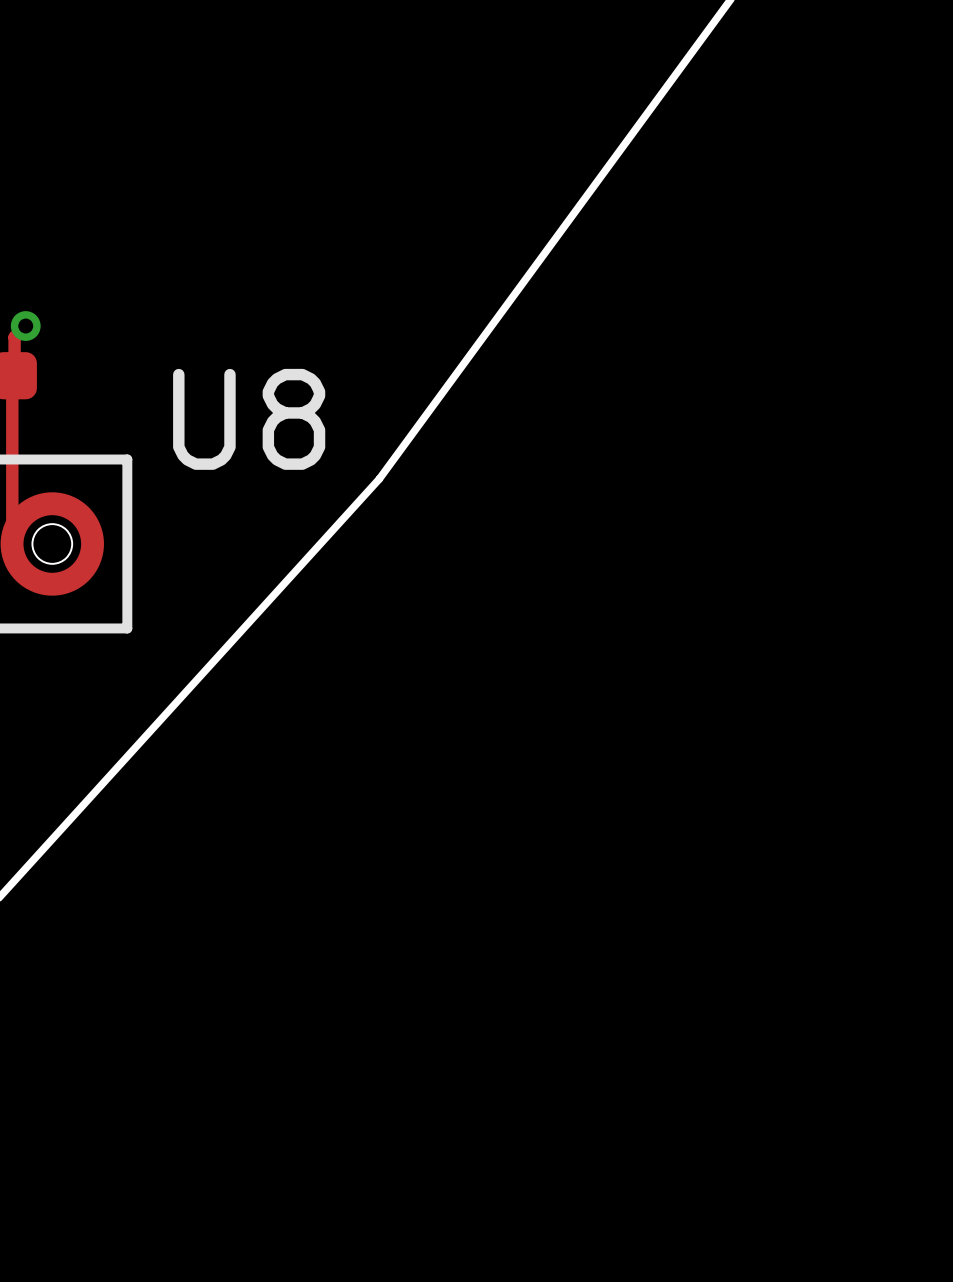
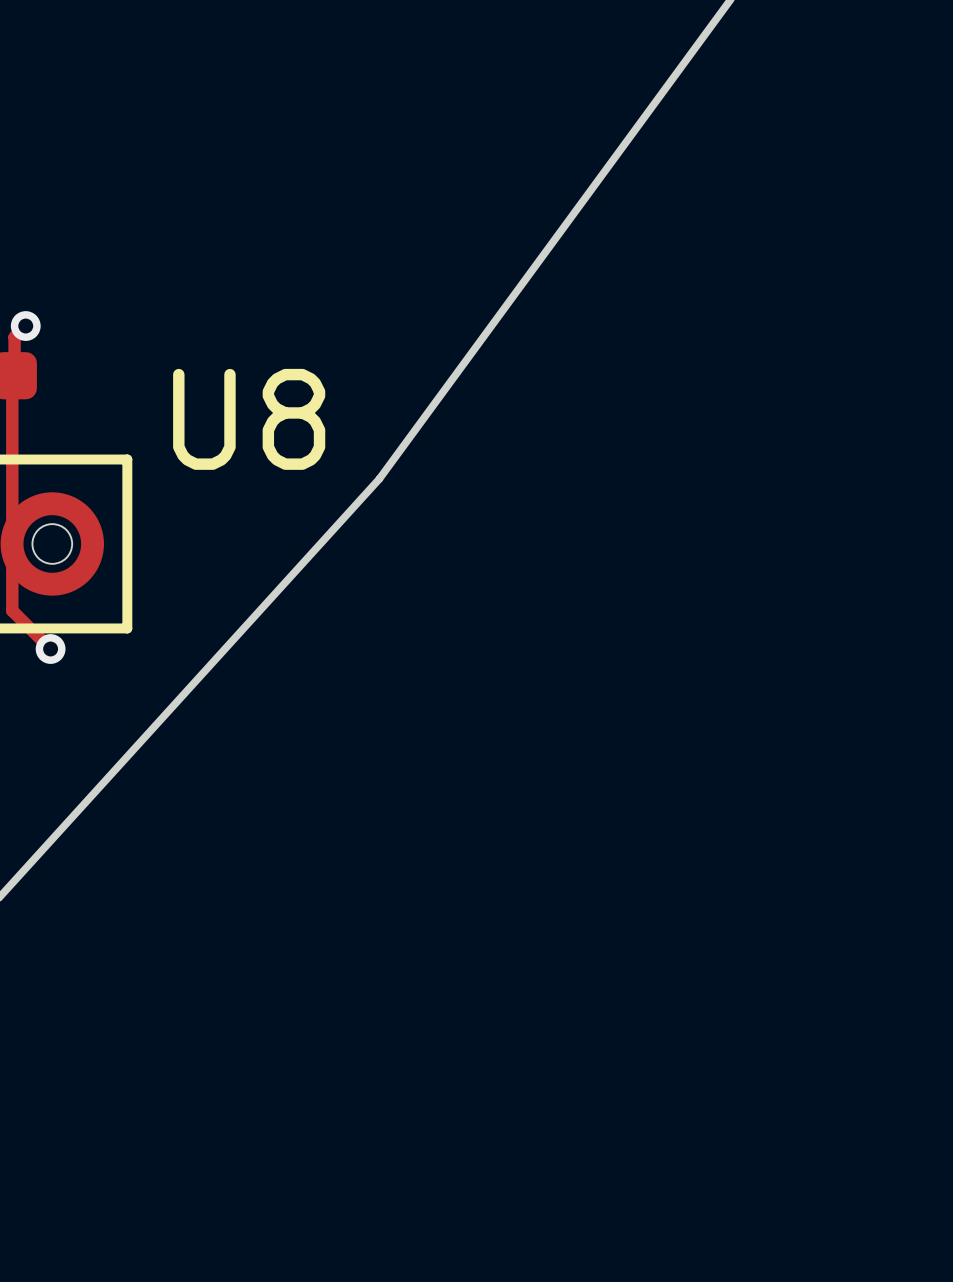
top track: none -> (12, 543) (12, 610) (50, 649)
via: none -> (50, 649)

